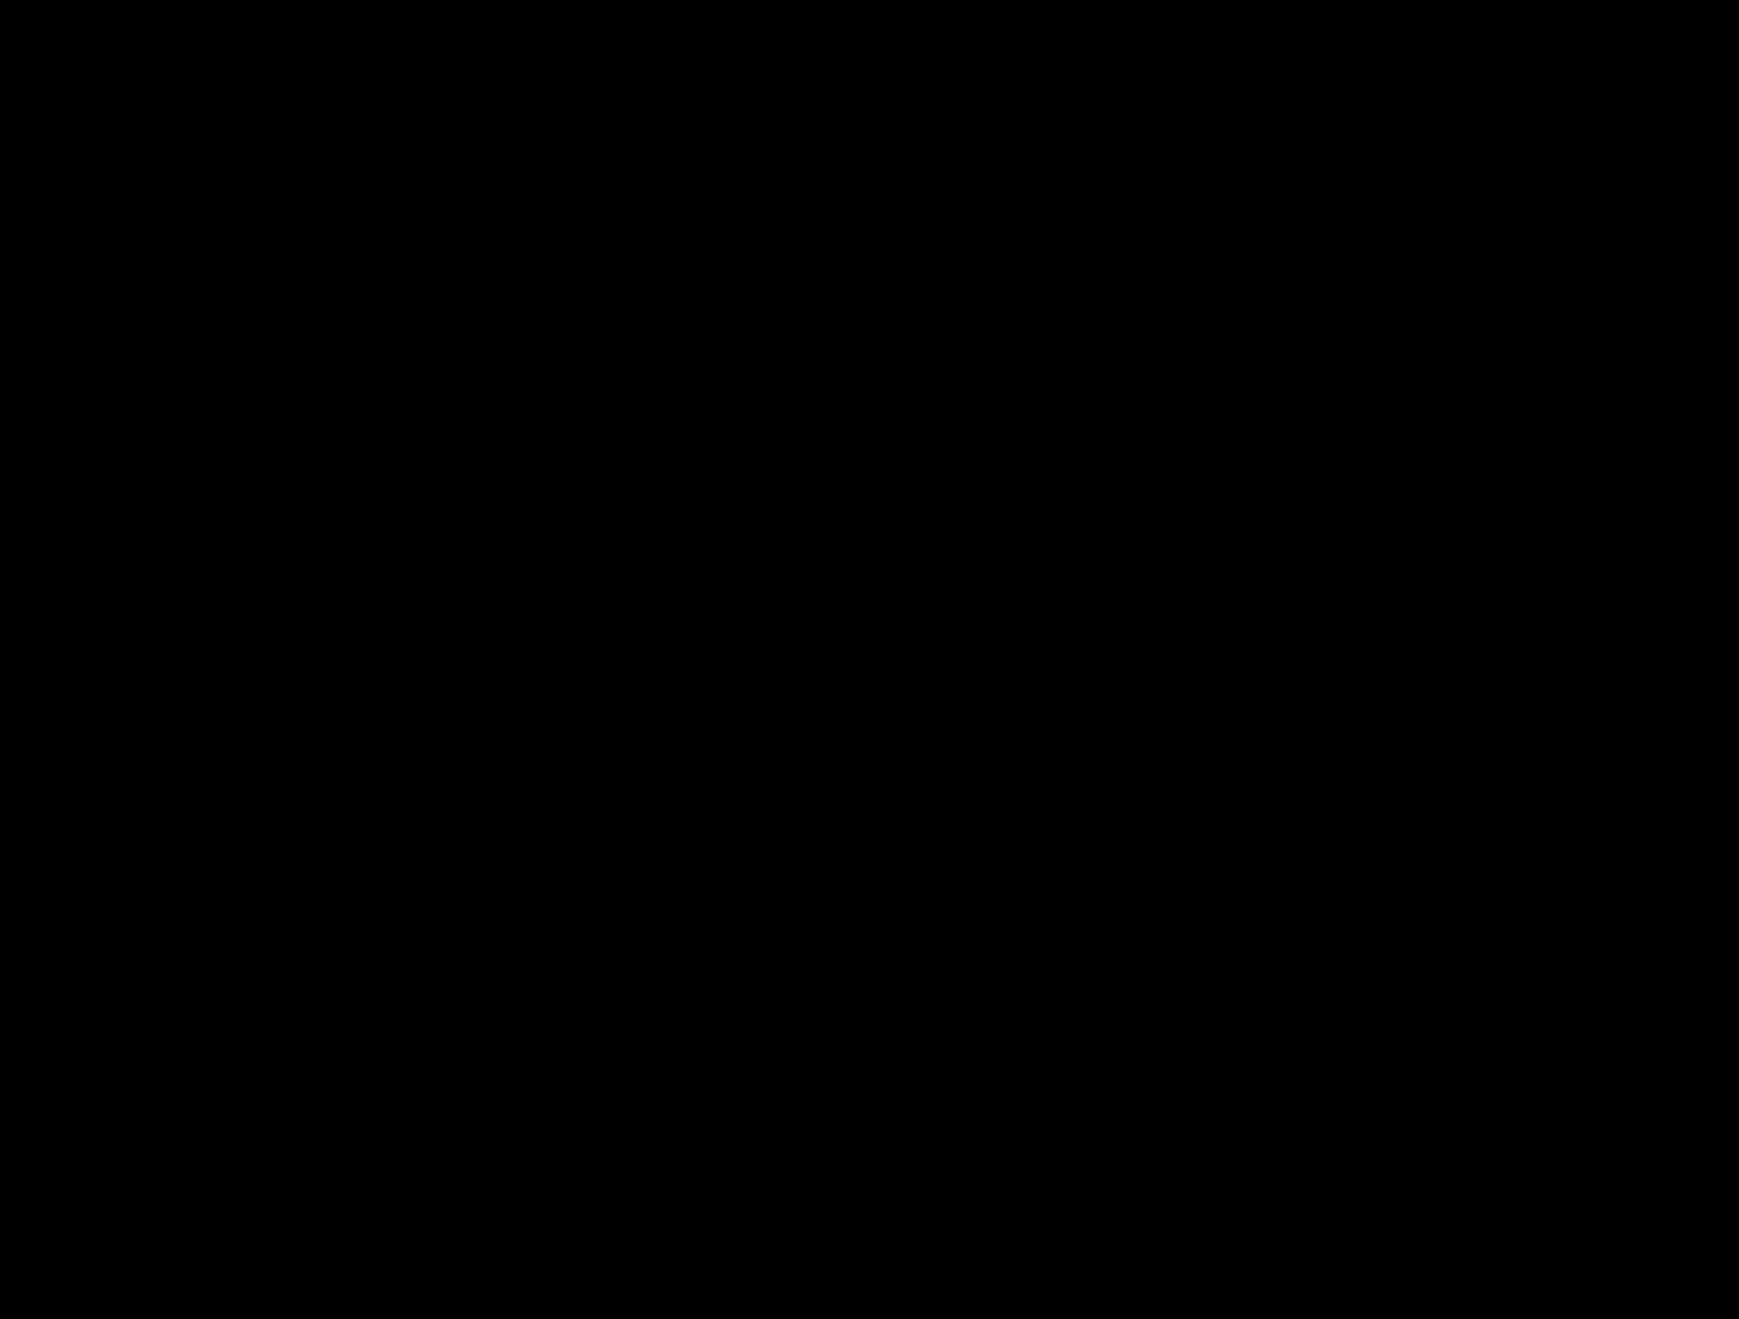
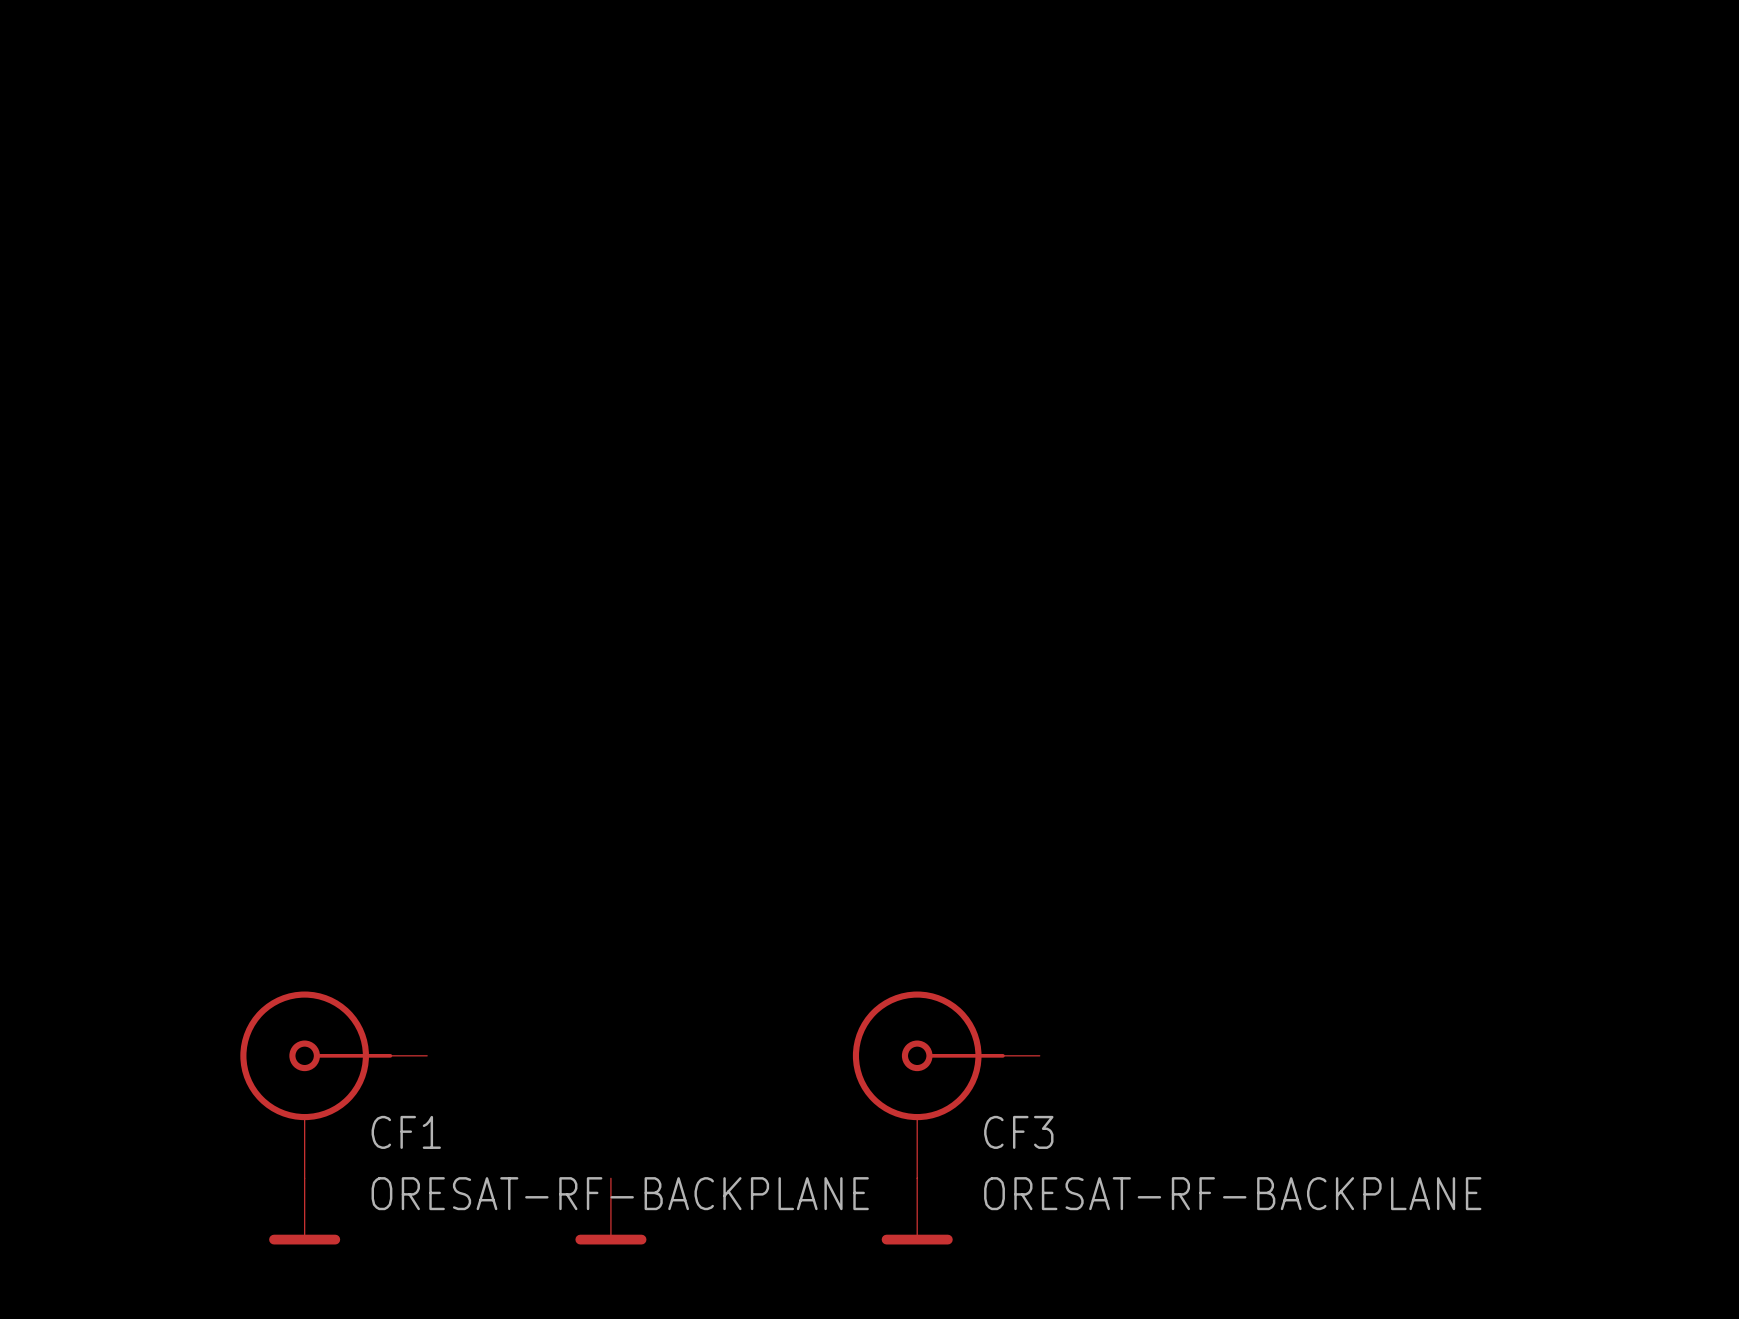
CF1: none -> ORESAT-RF-BACKPLANE (333, 1084)
CF3: none -> ORESAT-RF-BACKPLANE (946, 1084)
power symbol: none -> (304, 1211)
power symbol: none -> (610, 1211)
power symbol: none -> (917, 1211)

